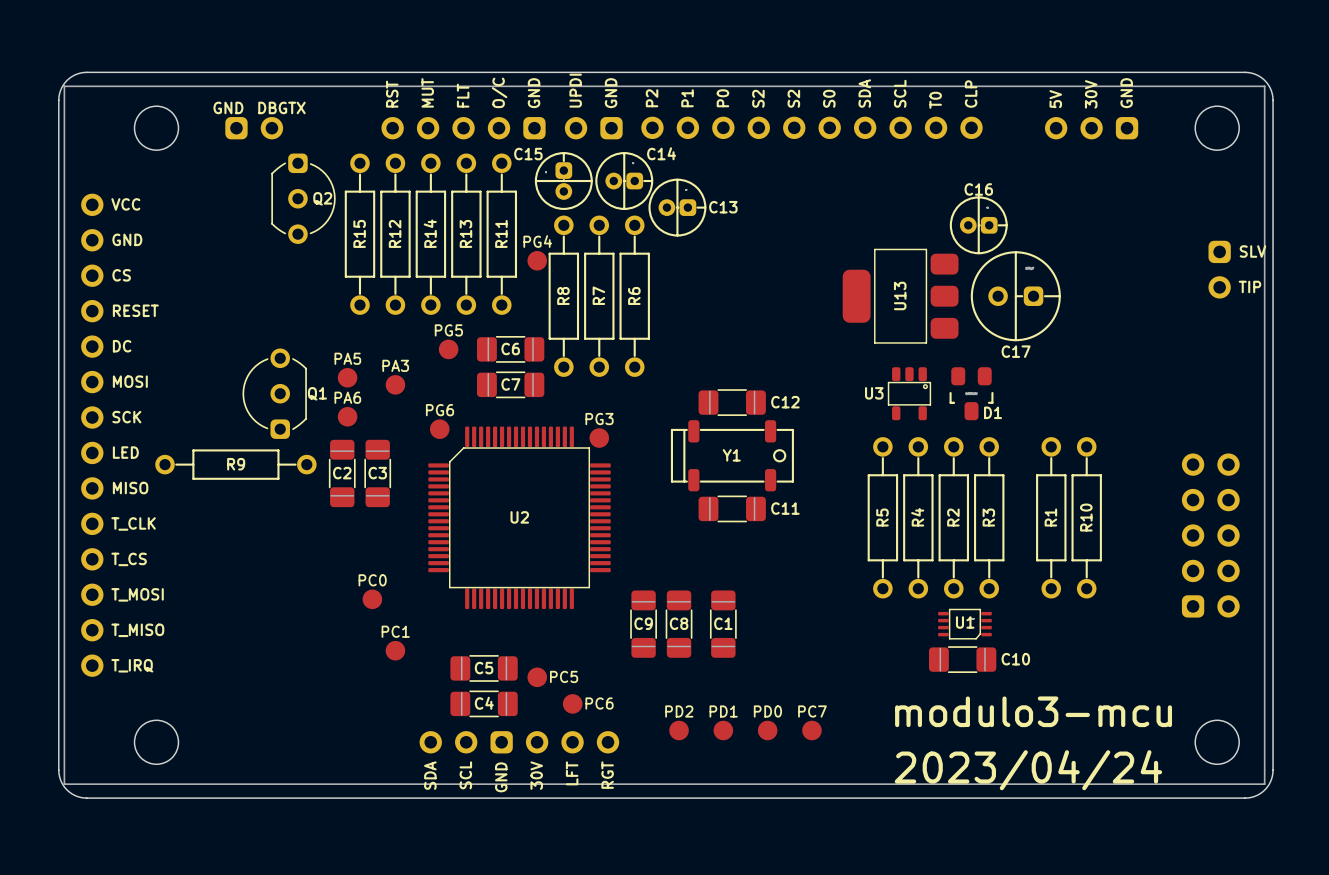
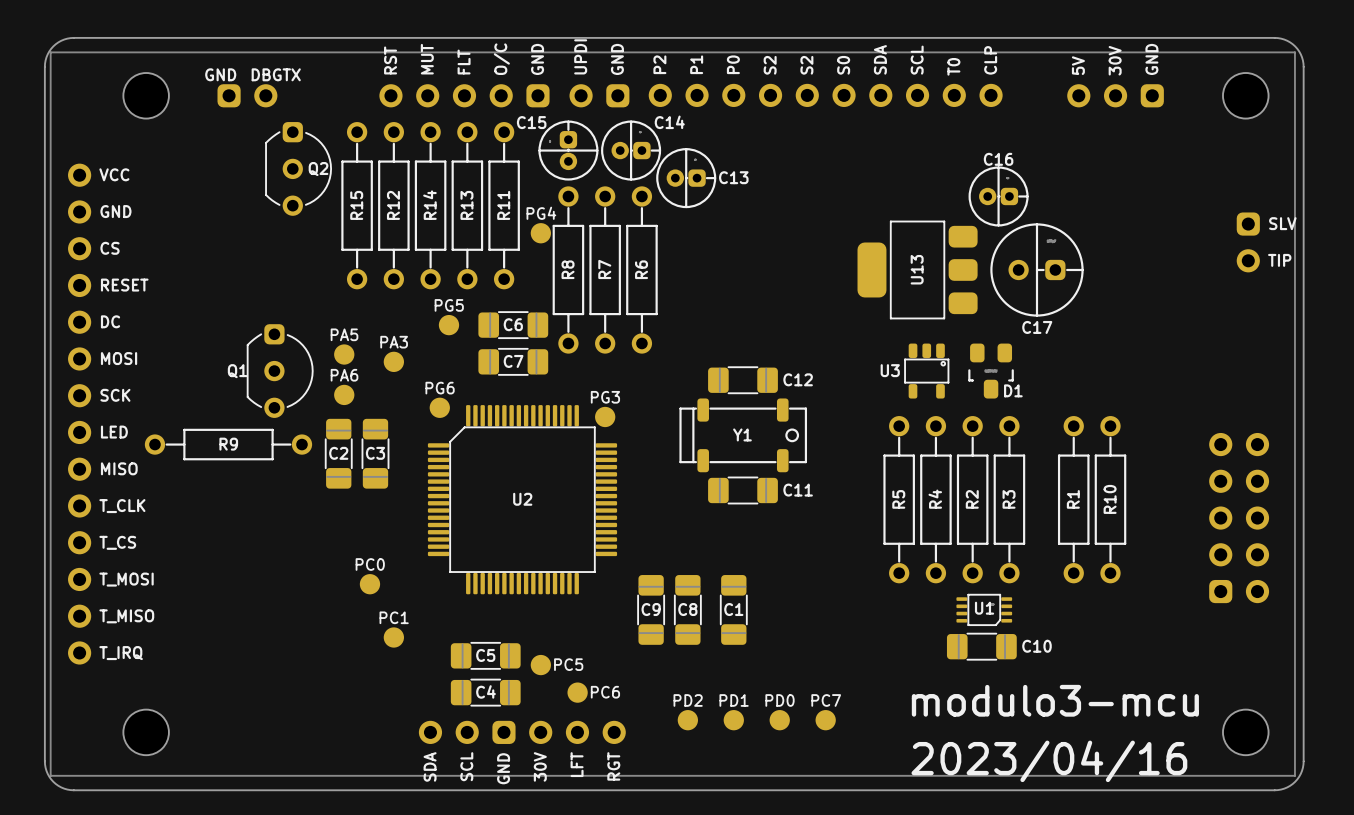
Q1 rotation: 0° (274, 393) -> 180° (280, 371)
text: 2023/04/24 (1028, 770) -> 2023/04/16 (1049, 761)

